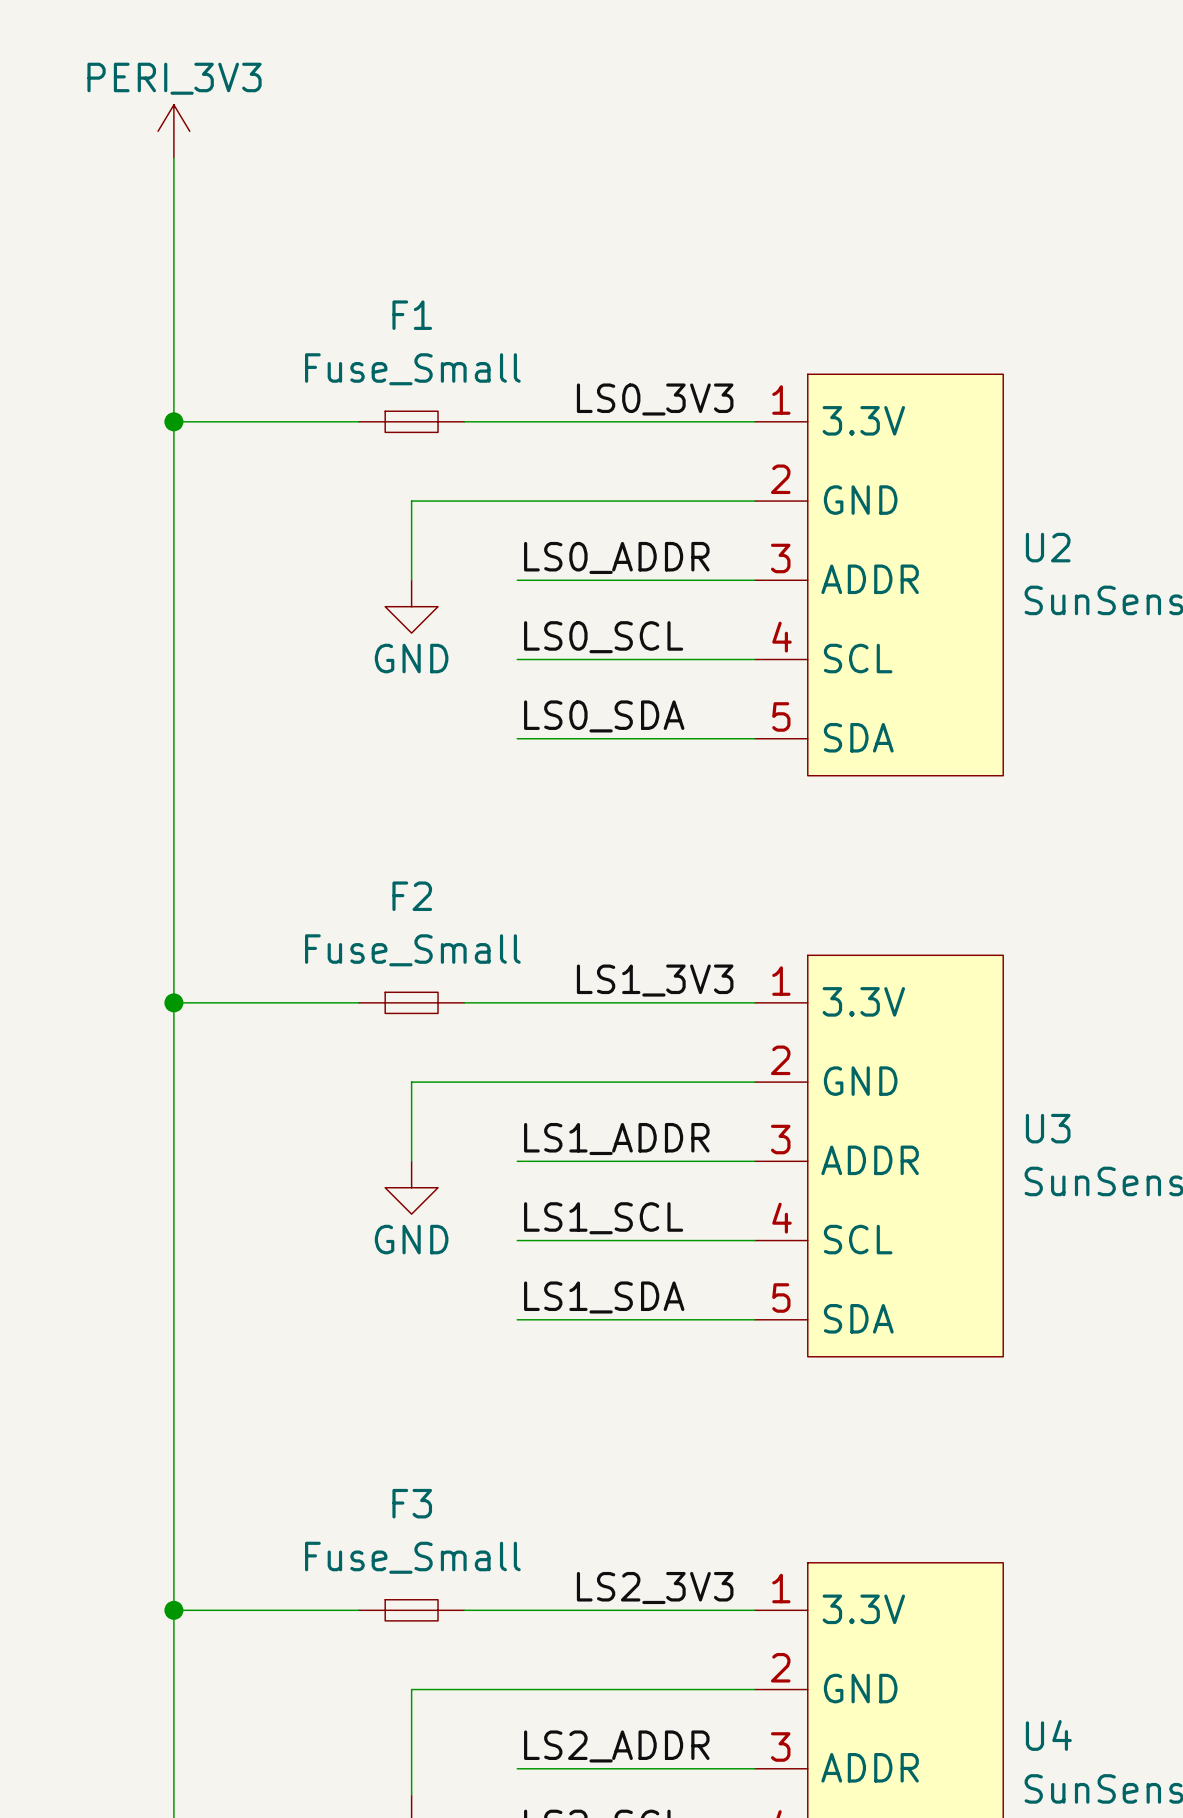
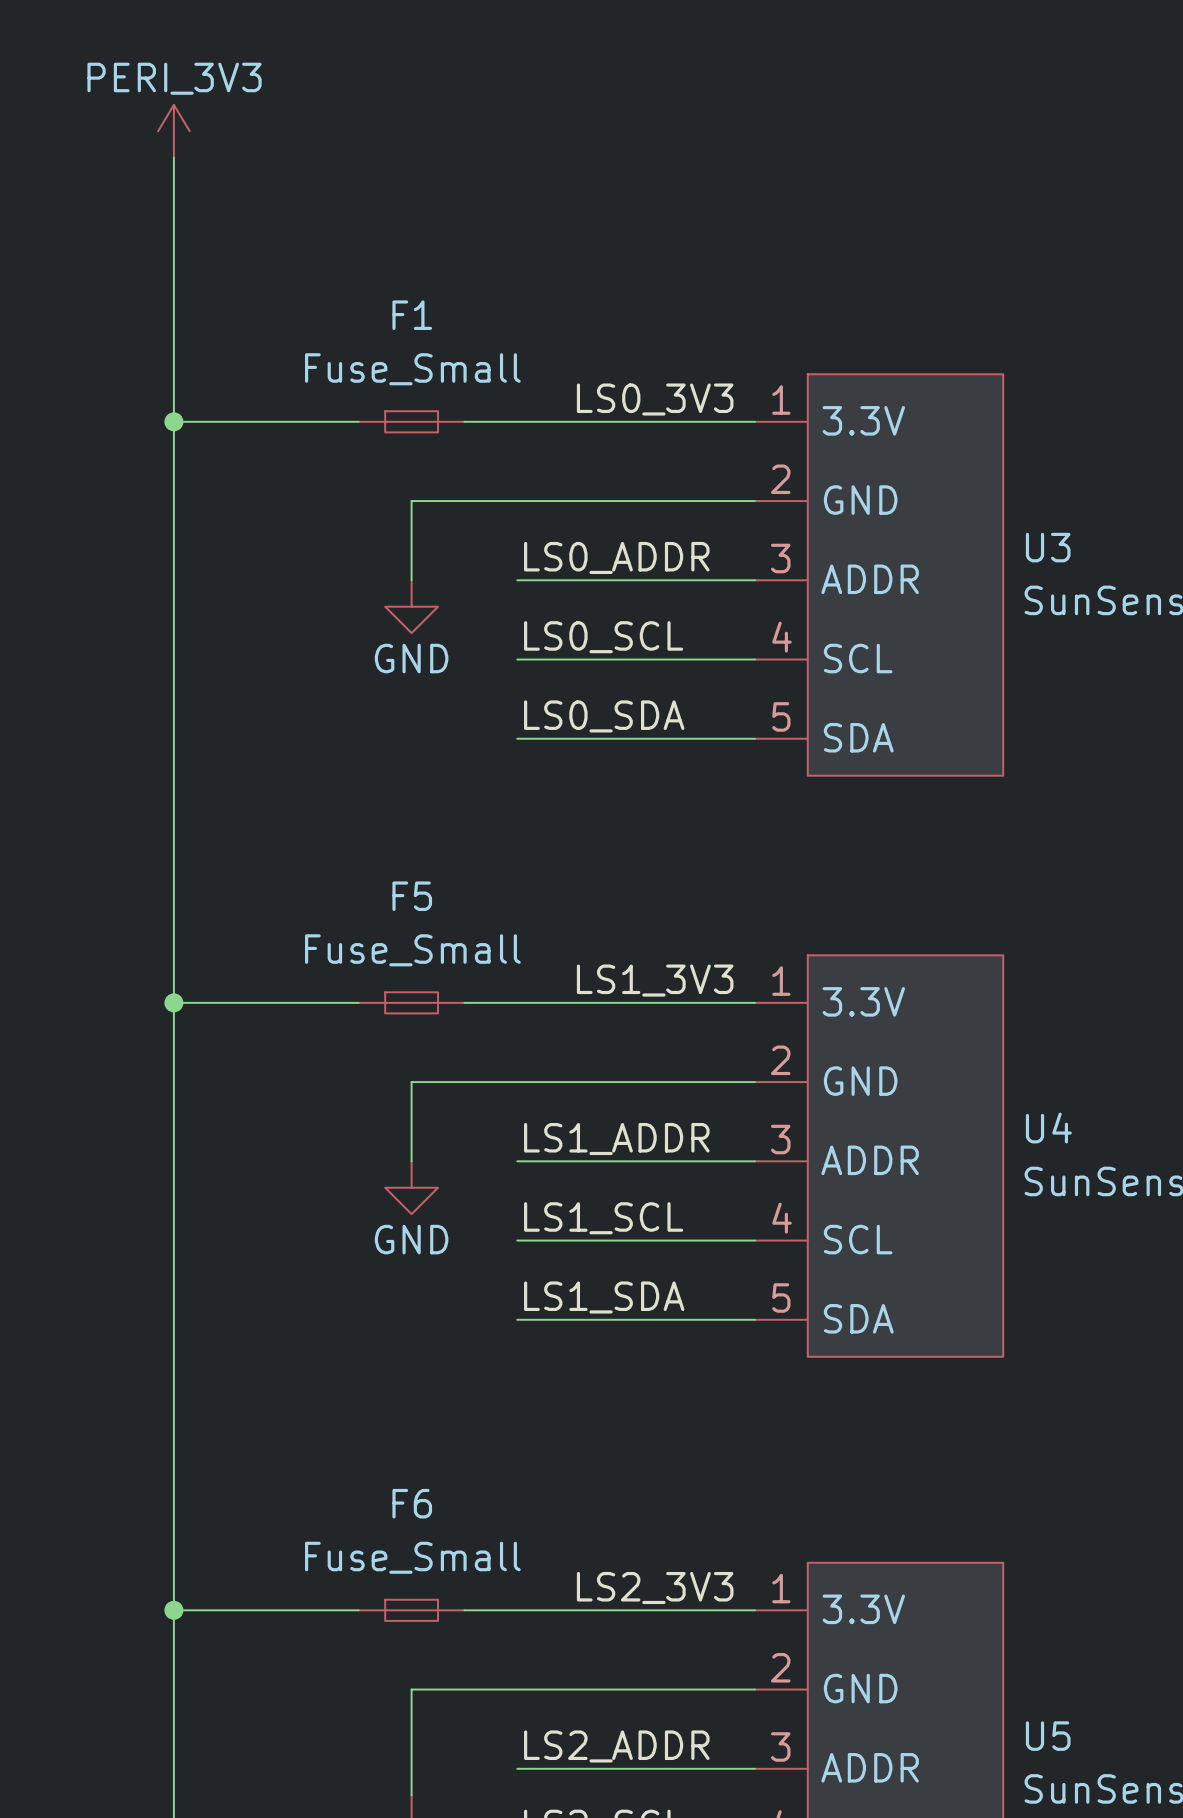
U2 name: U2 (1048, 547) -> U3 (1048, 547)
F2 name: F2 (412, 896) -> F5 (412, 896)
U3 name: U3 (1048, 1128) -> U4 (1048, 1128)
F3 name: F3 (412, 1503) -> F6 (412, 1503)
U4 name: U4 (1048, 1735) -> U5 (1048, 1736)

